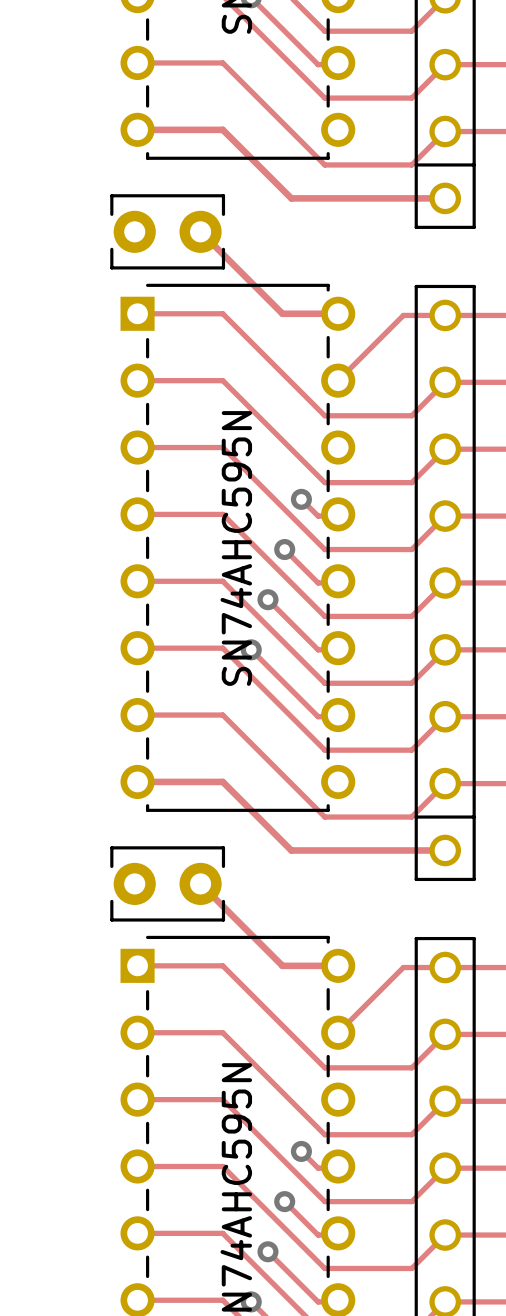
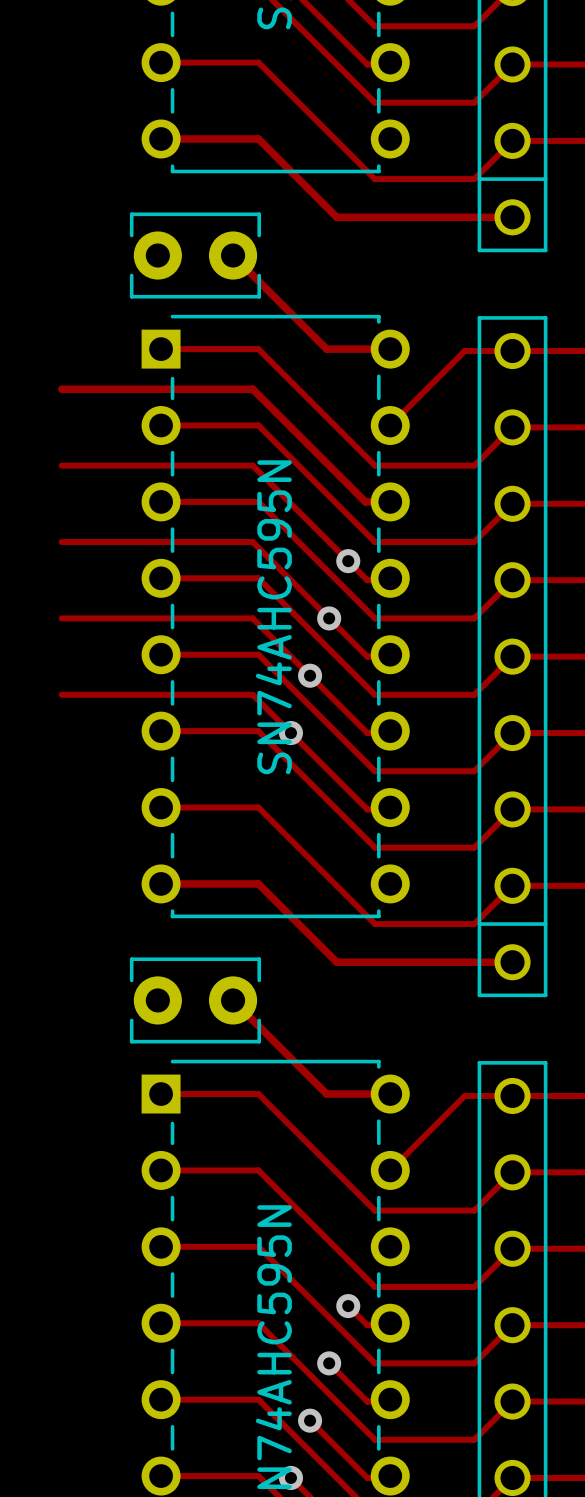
track: none -> (61, 389) (252, 389) (365, 501) (384, 501)
track: none -> (61, 465) (252, 465) (348, 561)
track: none -> (61, 542) (252, 542) (329, 618)
track: none -> (61, 618) (252, 618) (310, 675)
track: none -> (61, 694) (252, 694) (290, 733)

